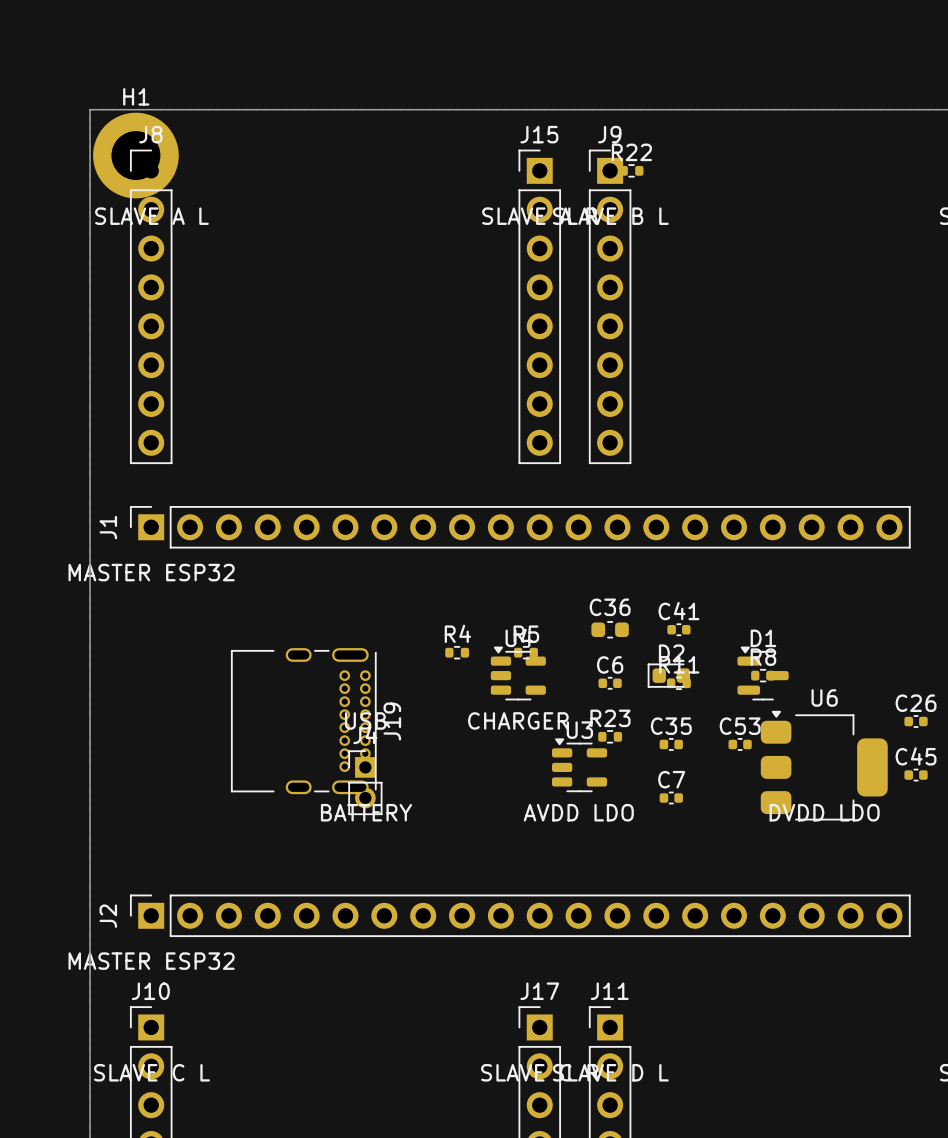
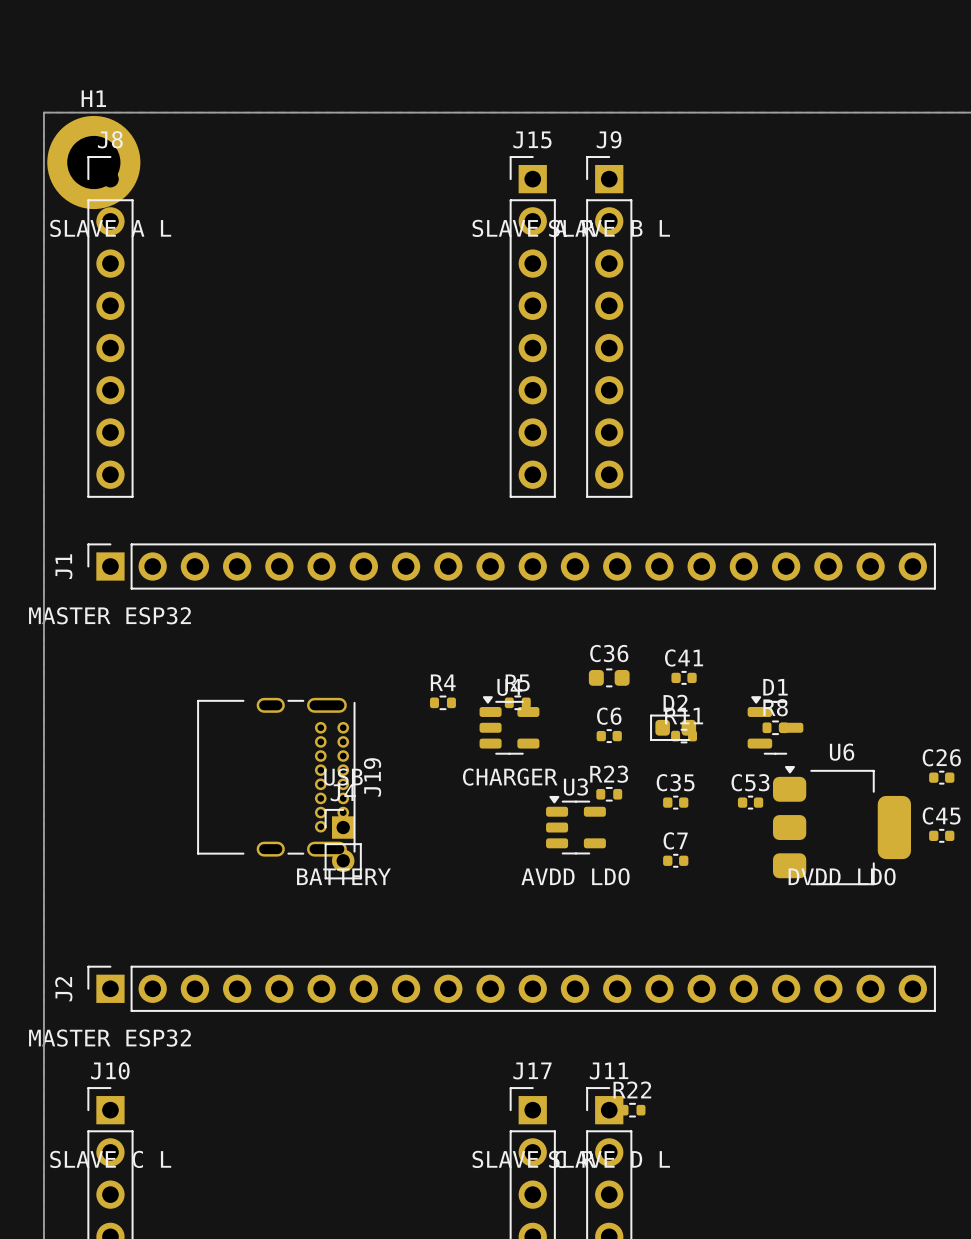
R22 position: (631, 170) -> (632, 1110)

